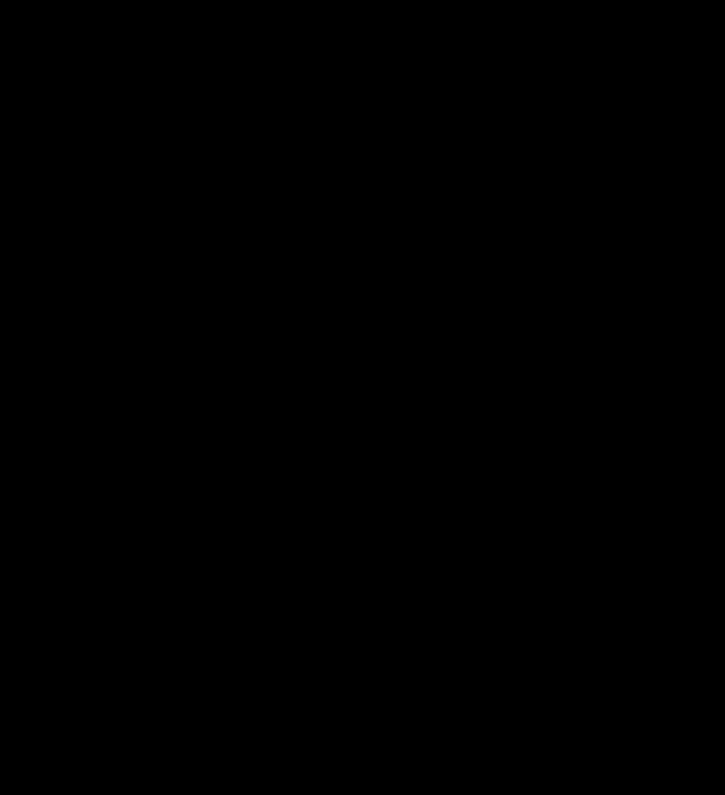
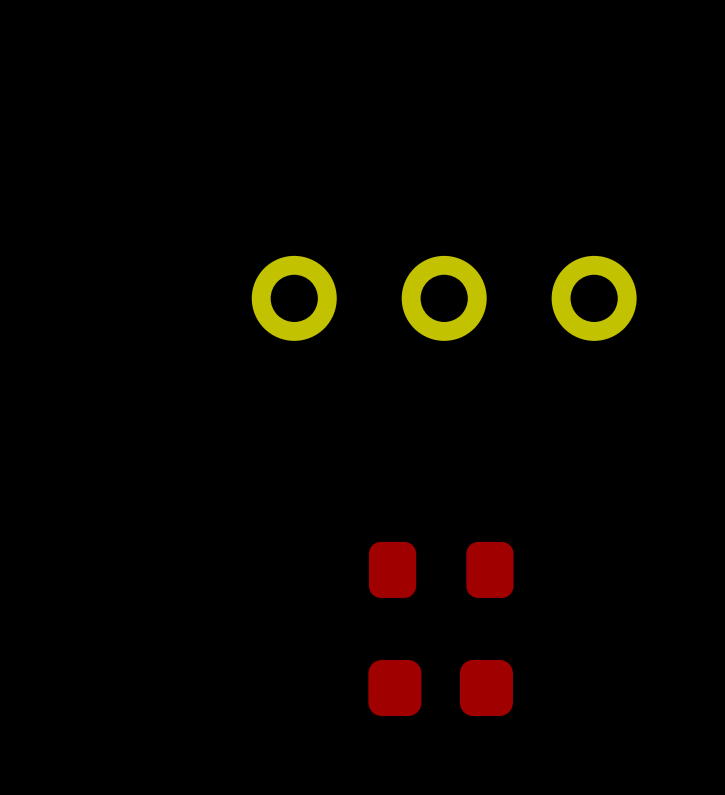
part: none -> (444, 298)
part: none -> (441, 569)
part: none -> (440, 687)

